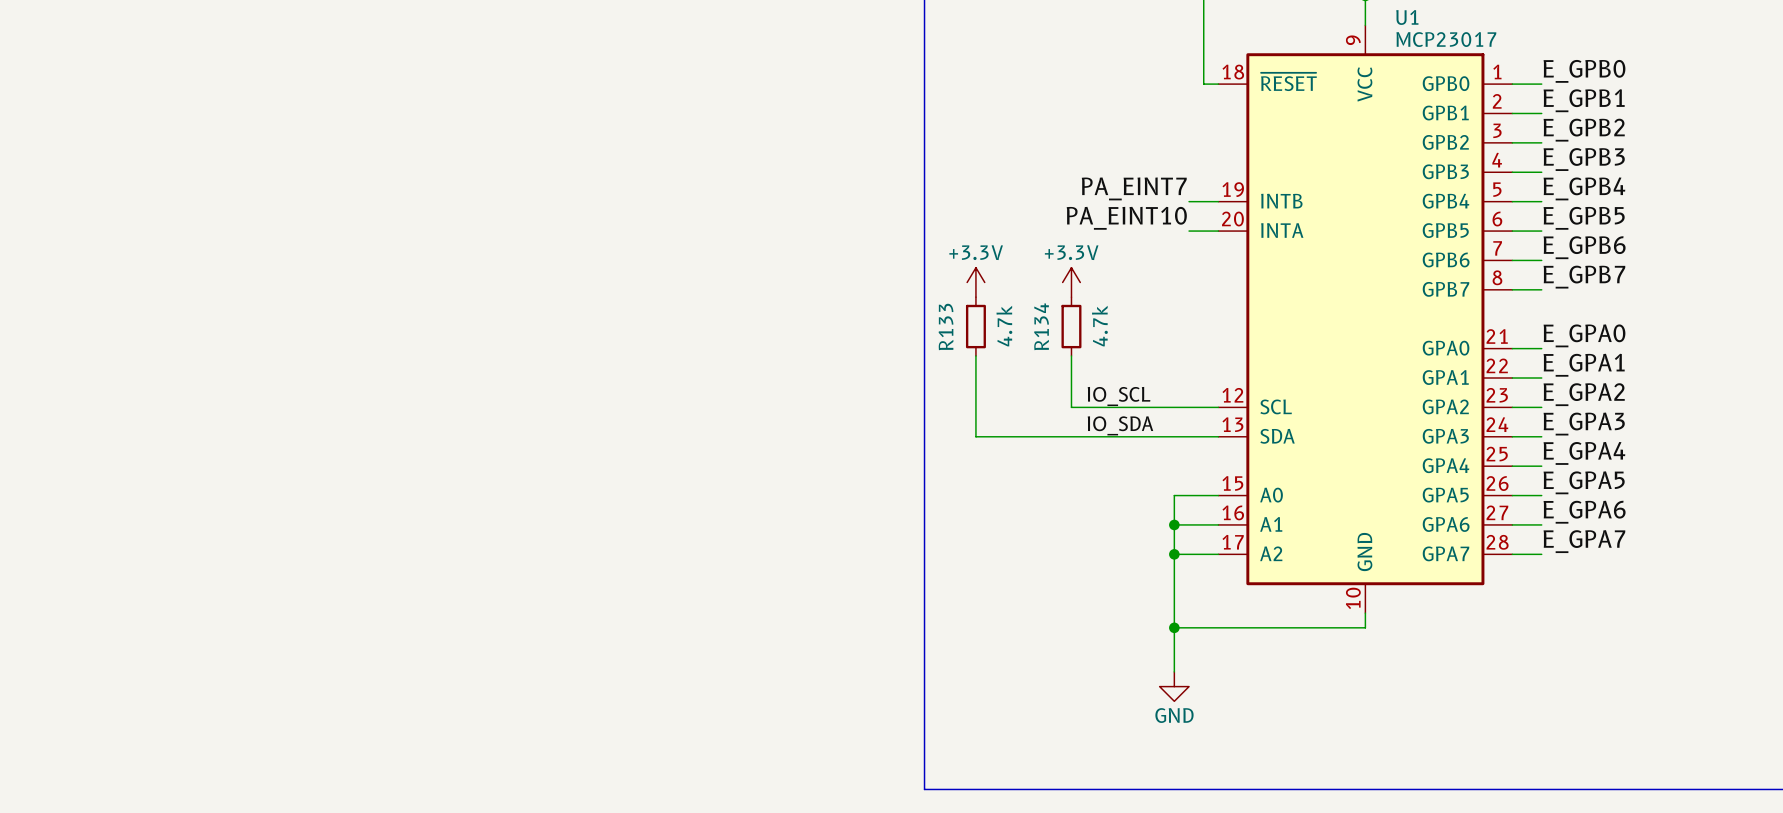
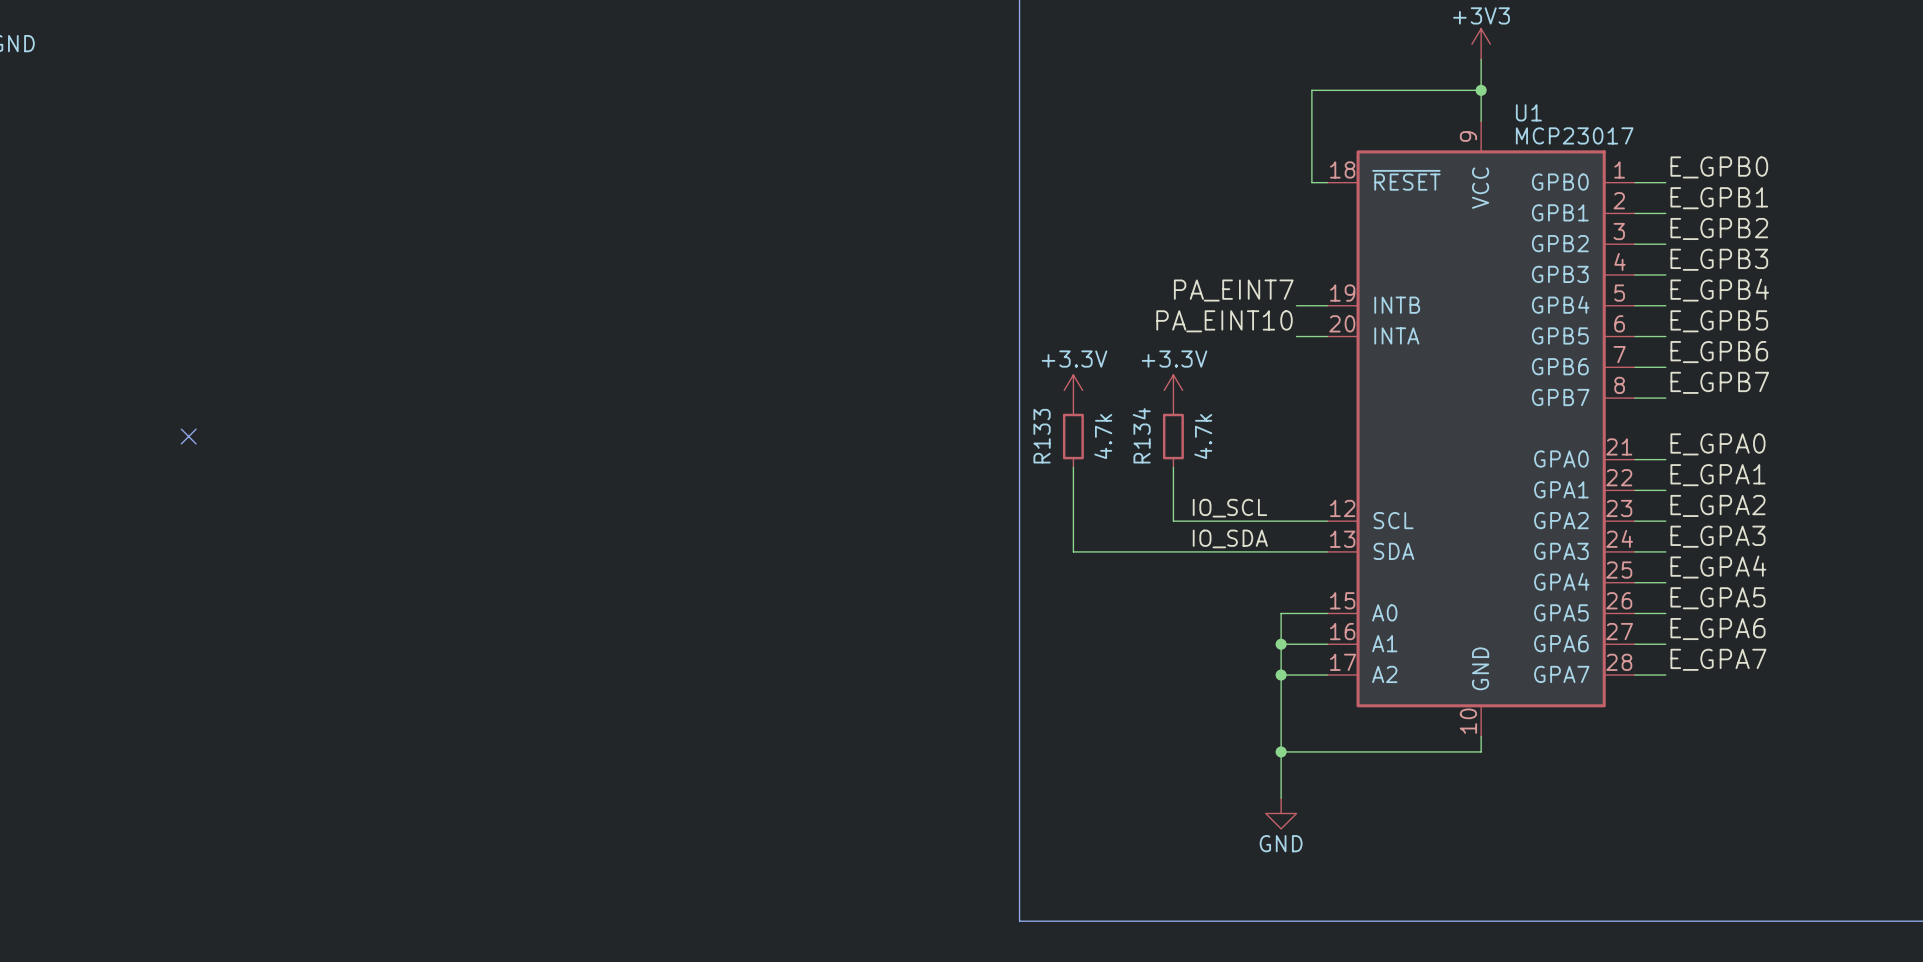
no-connect mark: none -> (188, 436)

